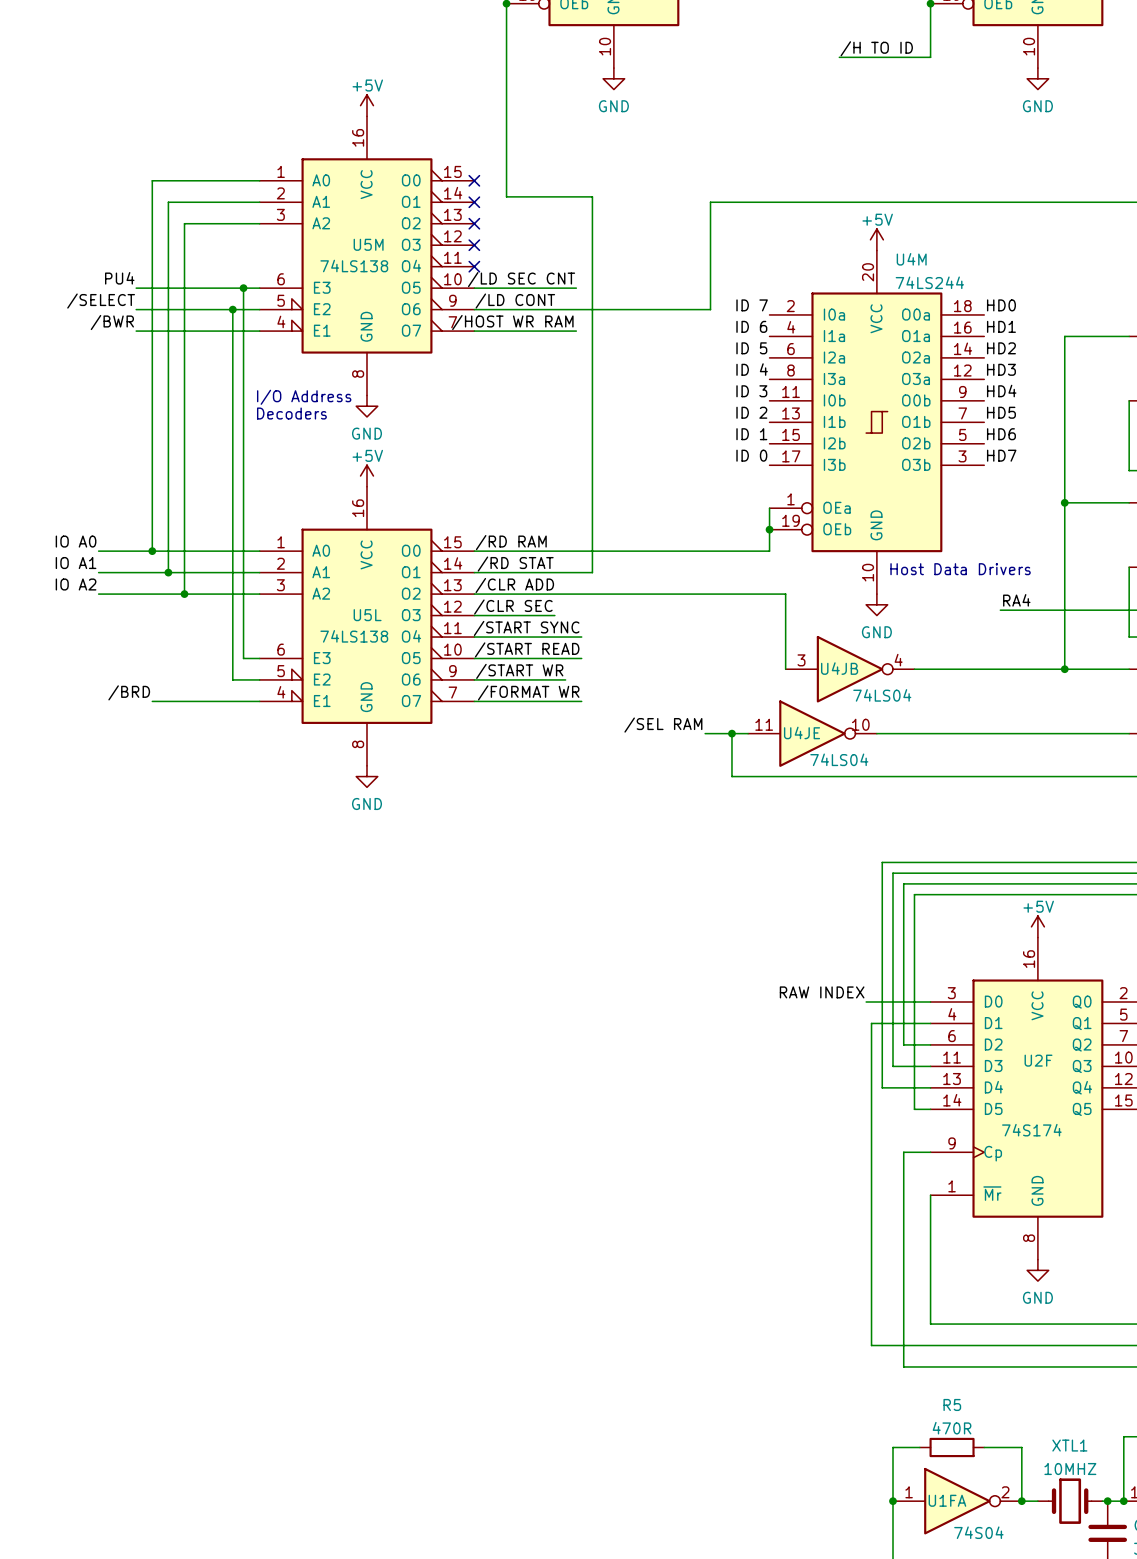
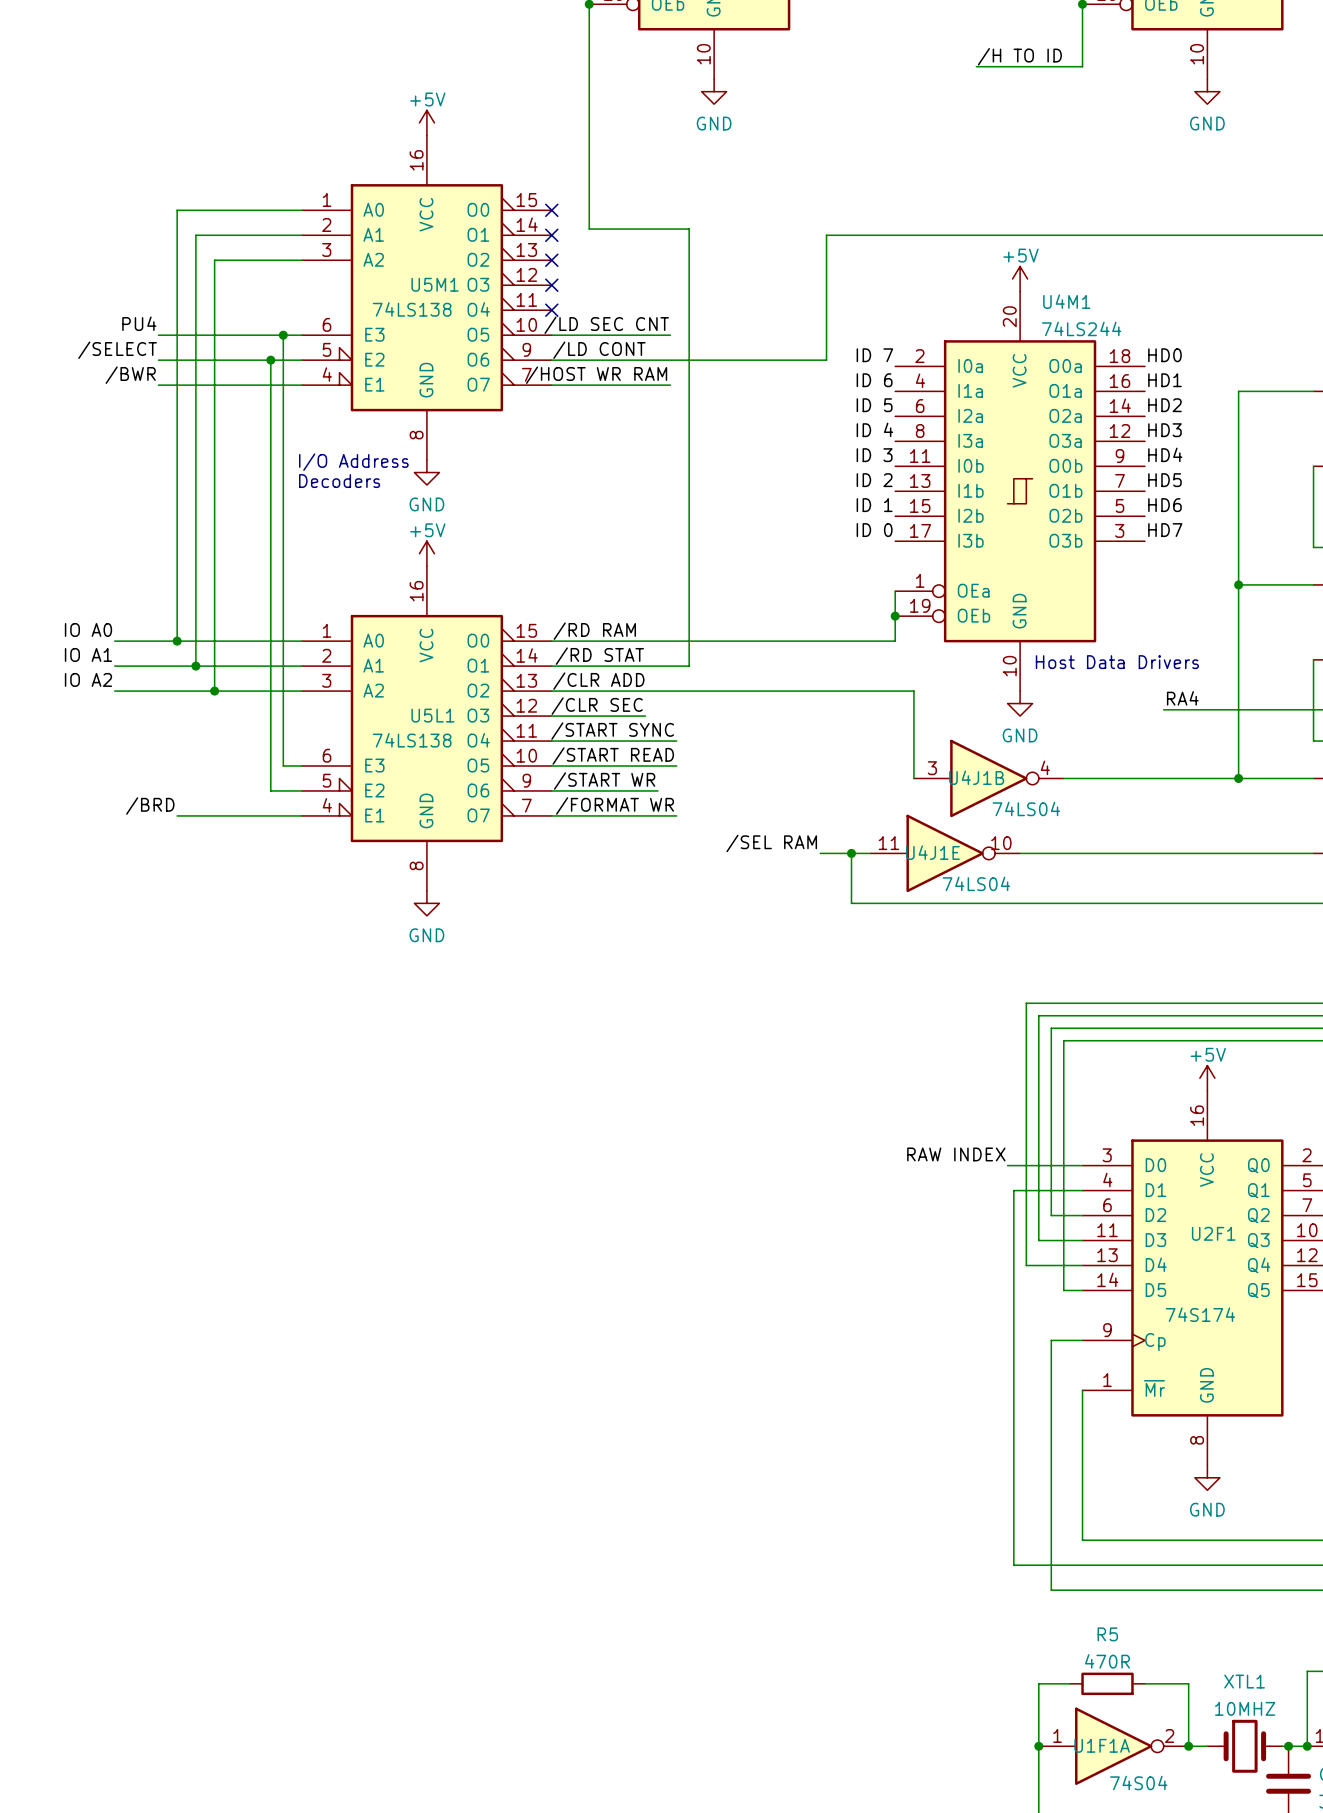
U5M name: U5M (368, 244) -> U5M1 (435, 284)
U4M name: U4M (911, 259) -> U4M1 (1066, 301)
U5L name: U5L (367, 615) -> U5L1 (432, 715)
U4JB name: U4JB (839, 668) -> U4J1B (976, 777)
U4JE name: U4JE (802, 732) -> U4J1E (932, 852)
U2F name: U2F (1038, 1060) -> U2F1 (1213, 1233)
U1FA name: U1FA (947, 1500) -> U1F1A (1102, 1745)

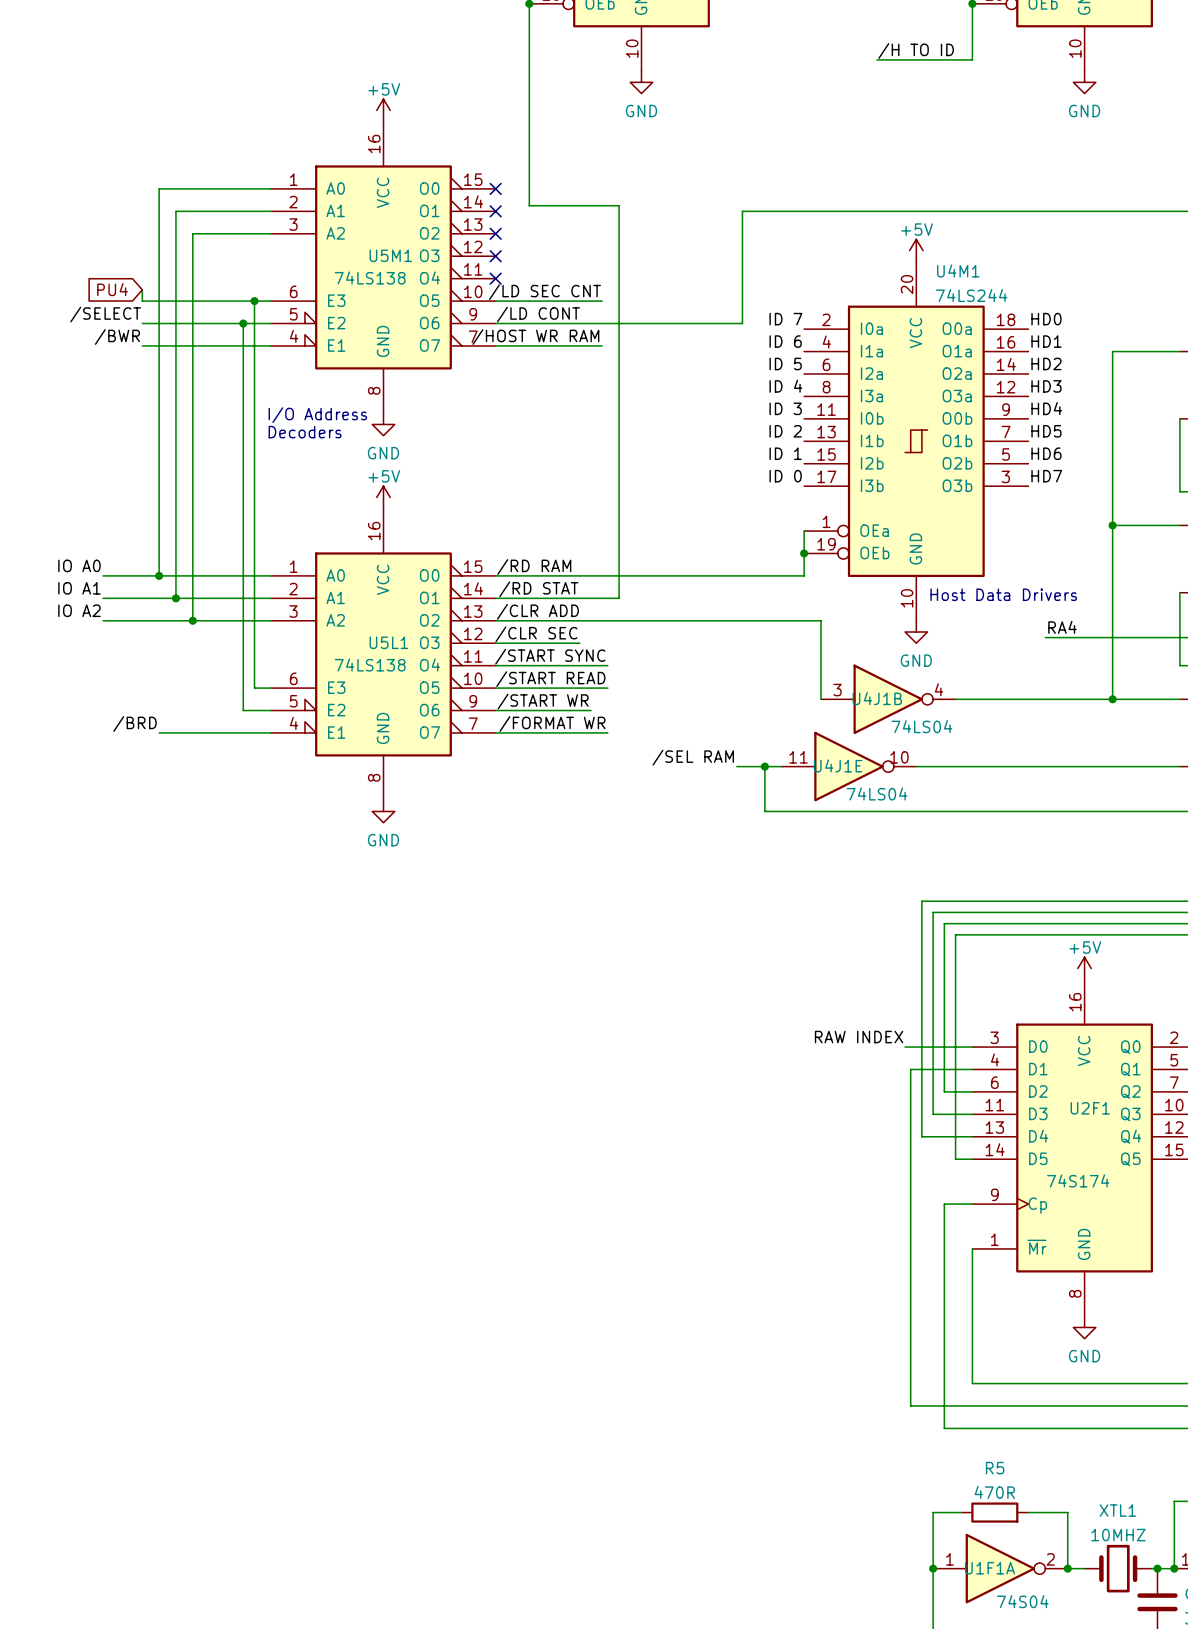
global label: none -> PU4 (112, 289)
wire: none -> (142, 289) (142, 301)
label: PU4 (139, 323) -> none

